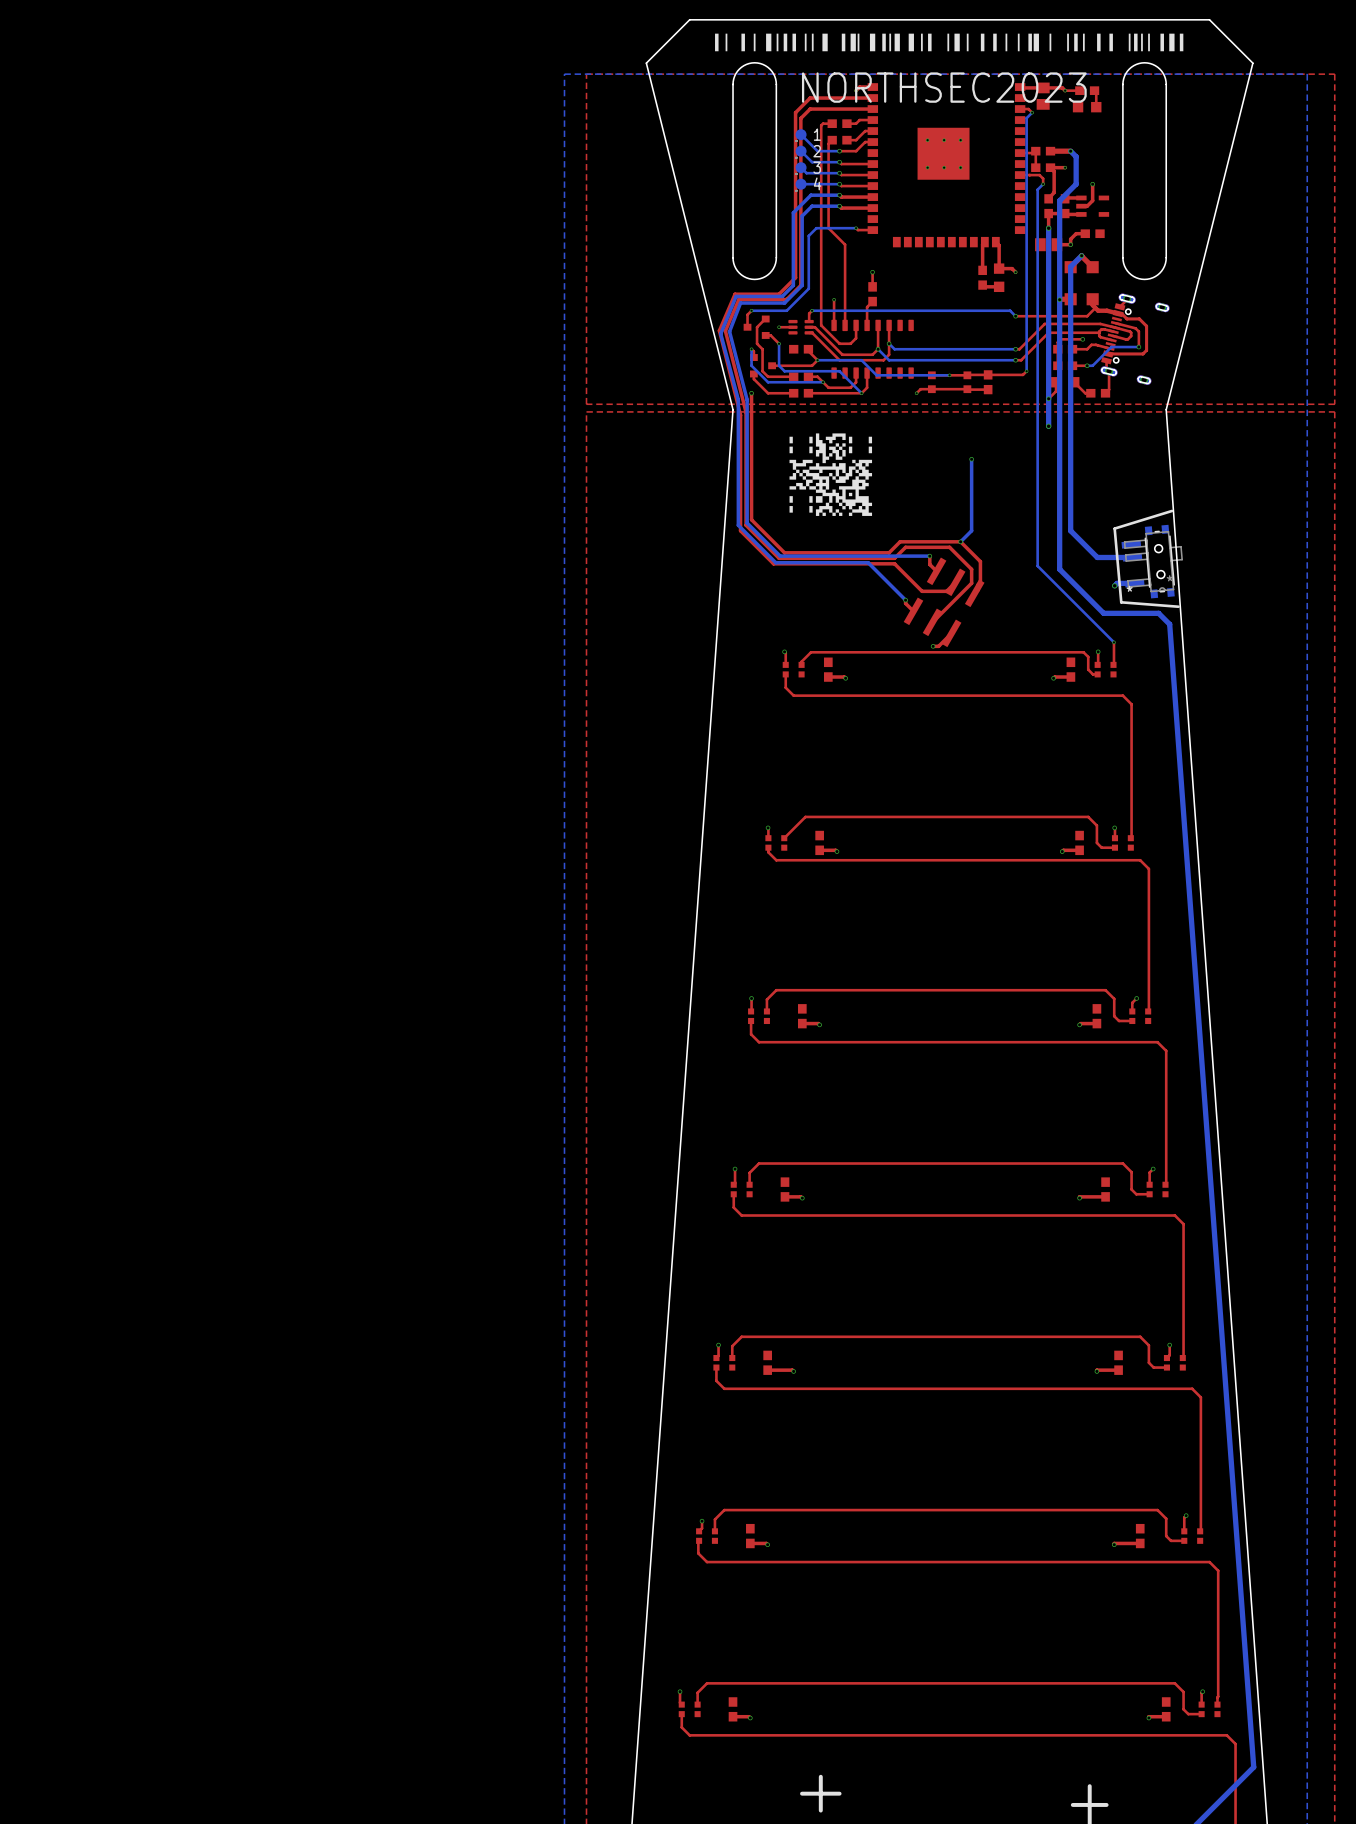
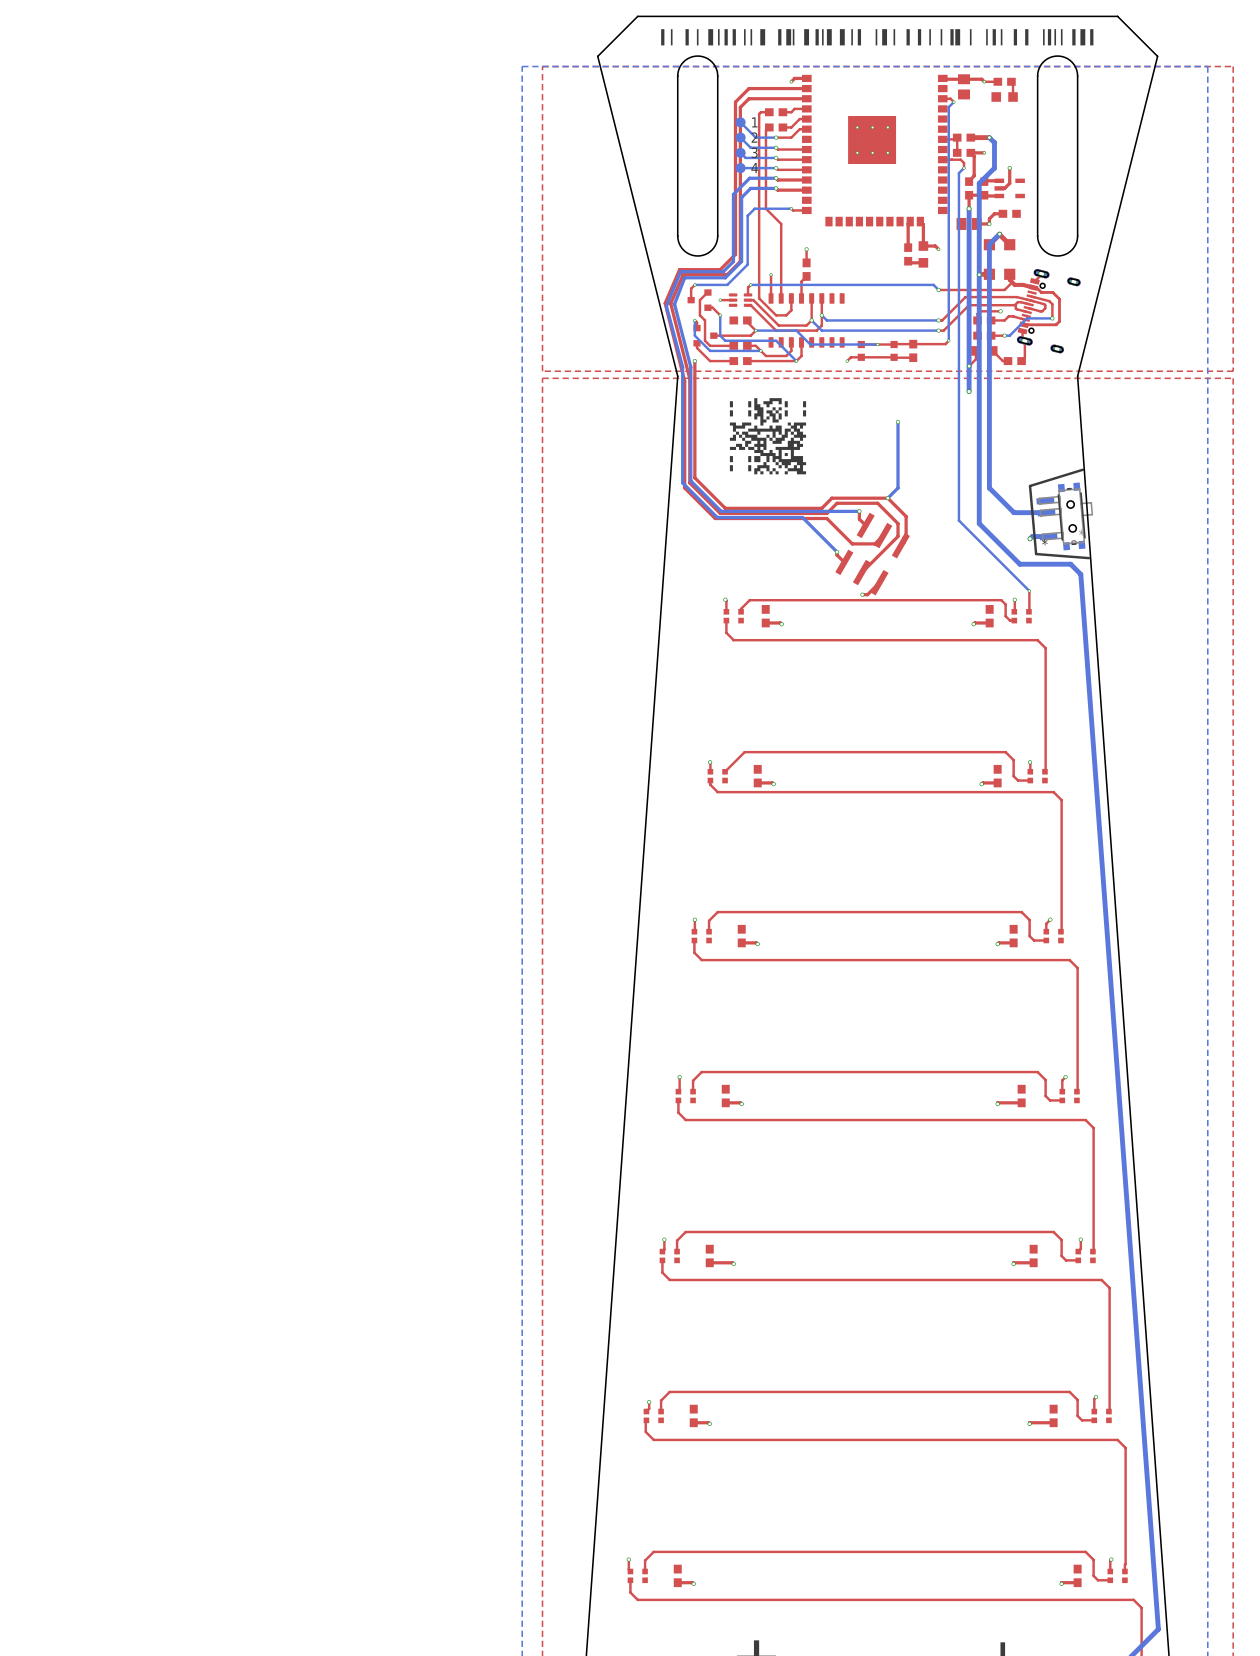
text: NORTHSEC2023 (944, 87) -> none

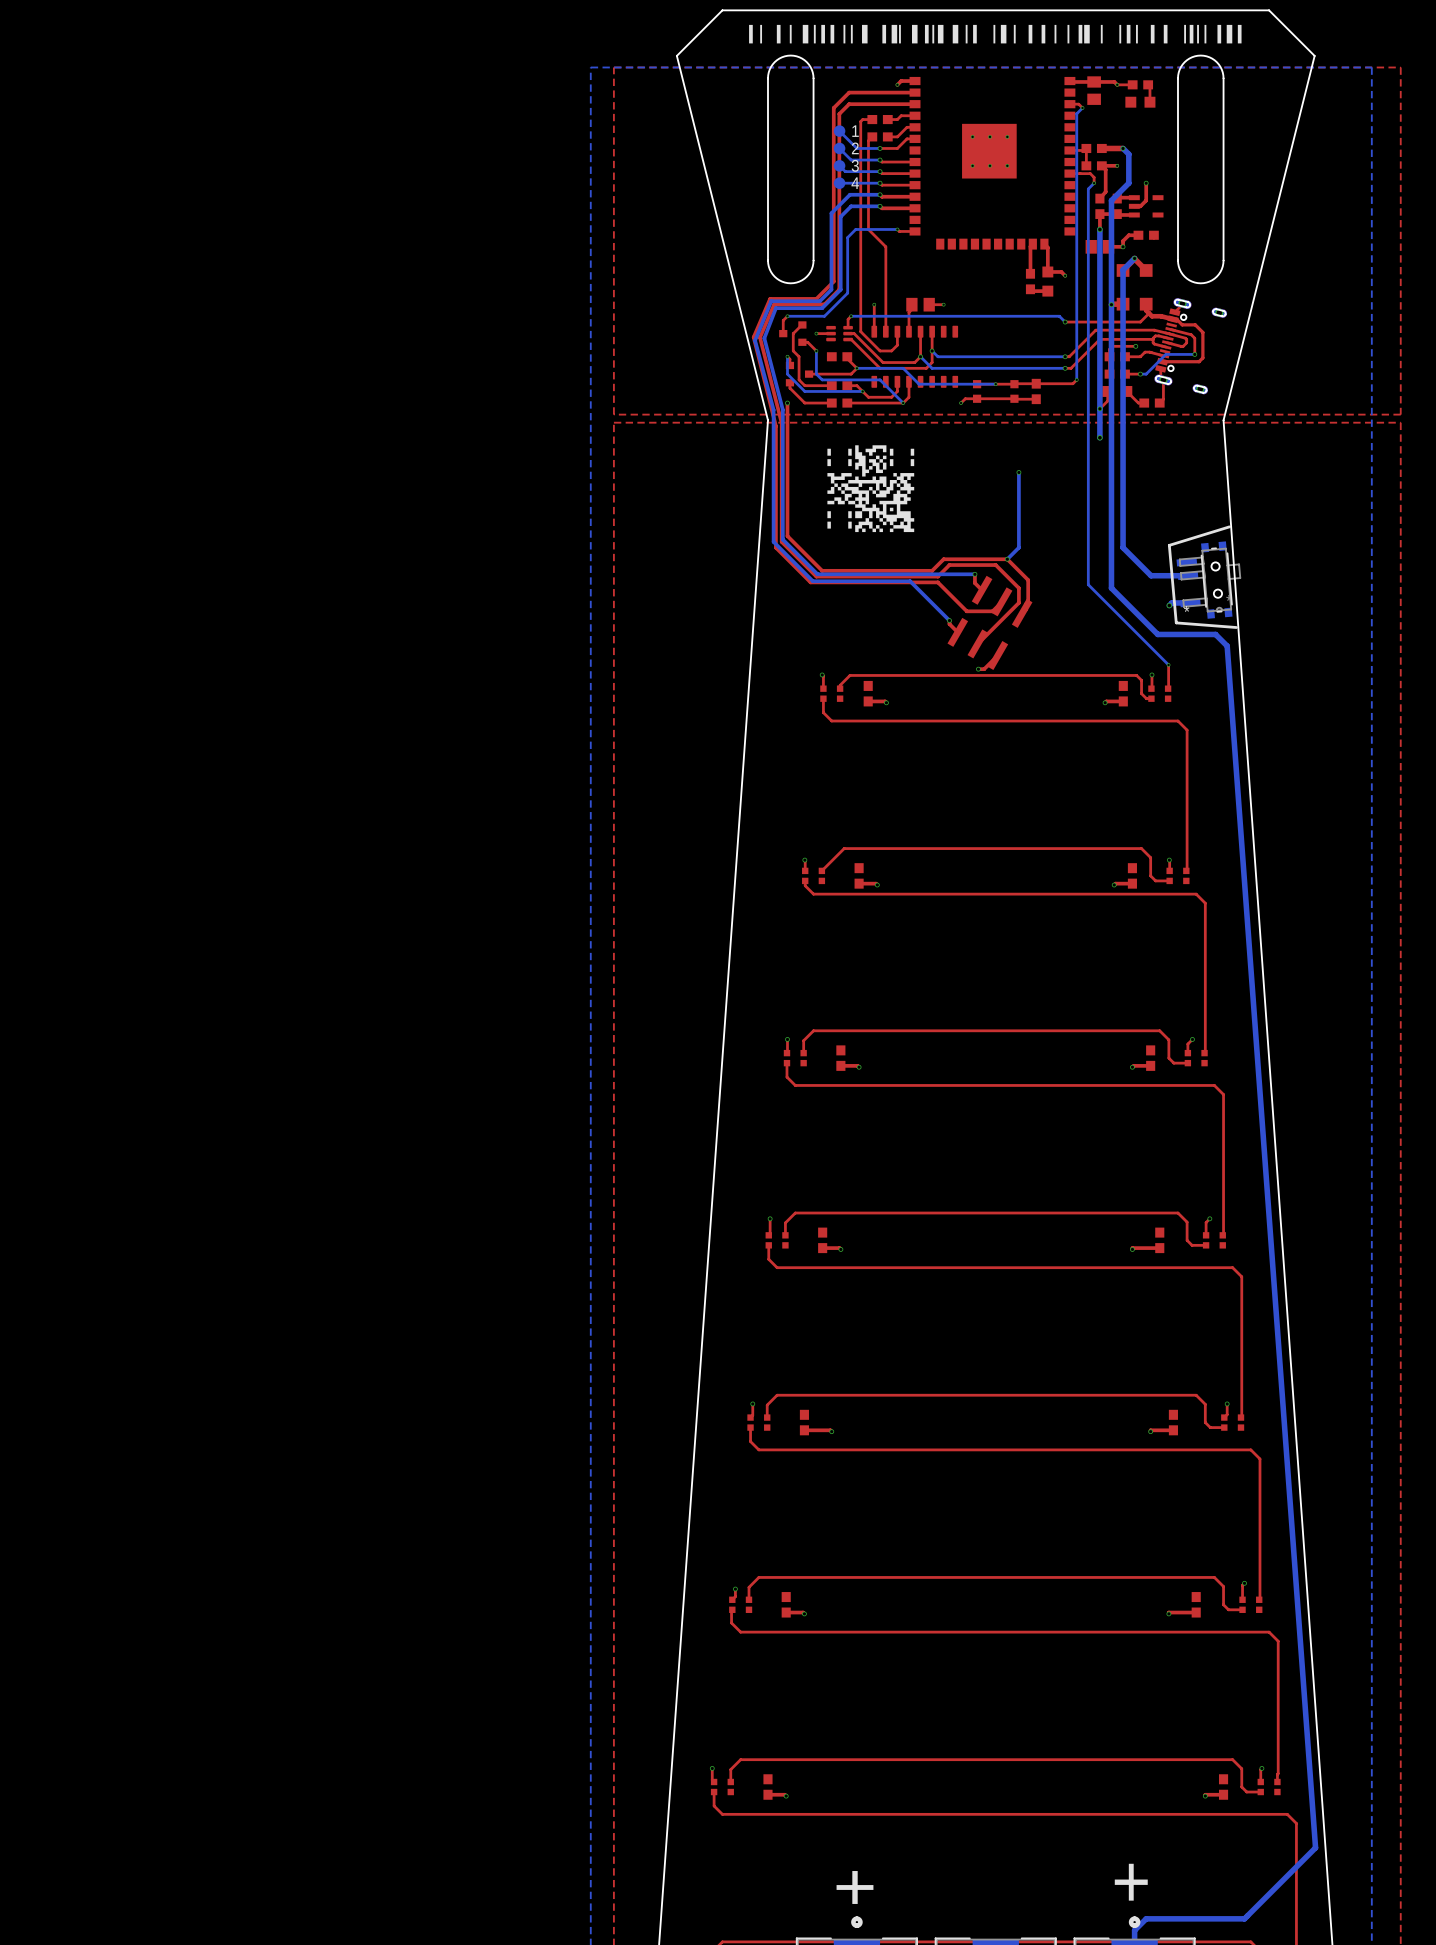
top track: (806, 249) (806, 262) -> none
via: (806, 249) -> none
part footprint: [802, 258, 811, 281] -> [906, 297, 935, 312]
top track: none -> (943, 304) (929, 304)
via: none -> (943, 304)

